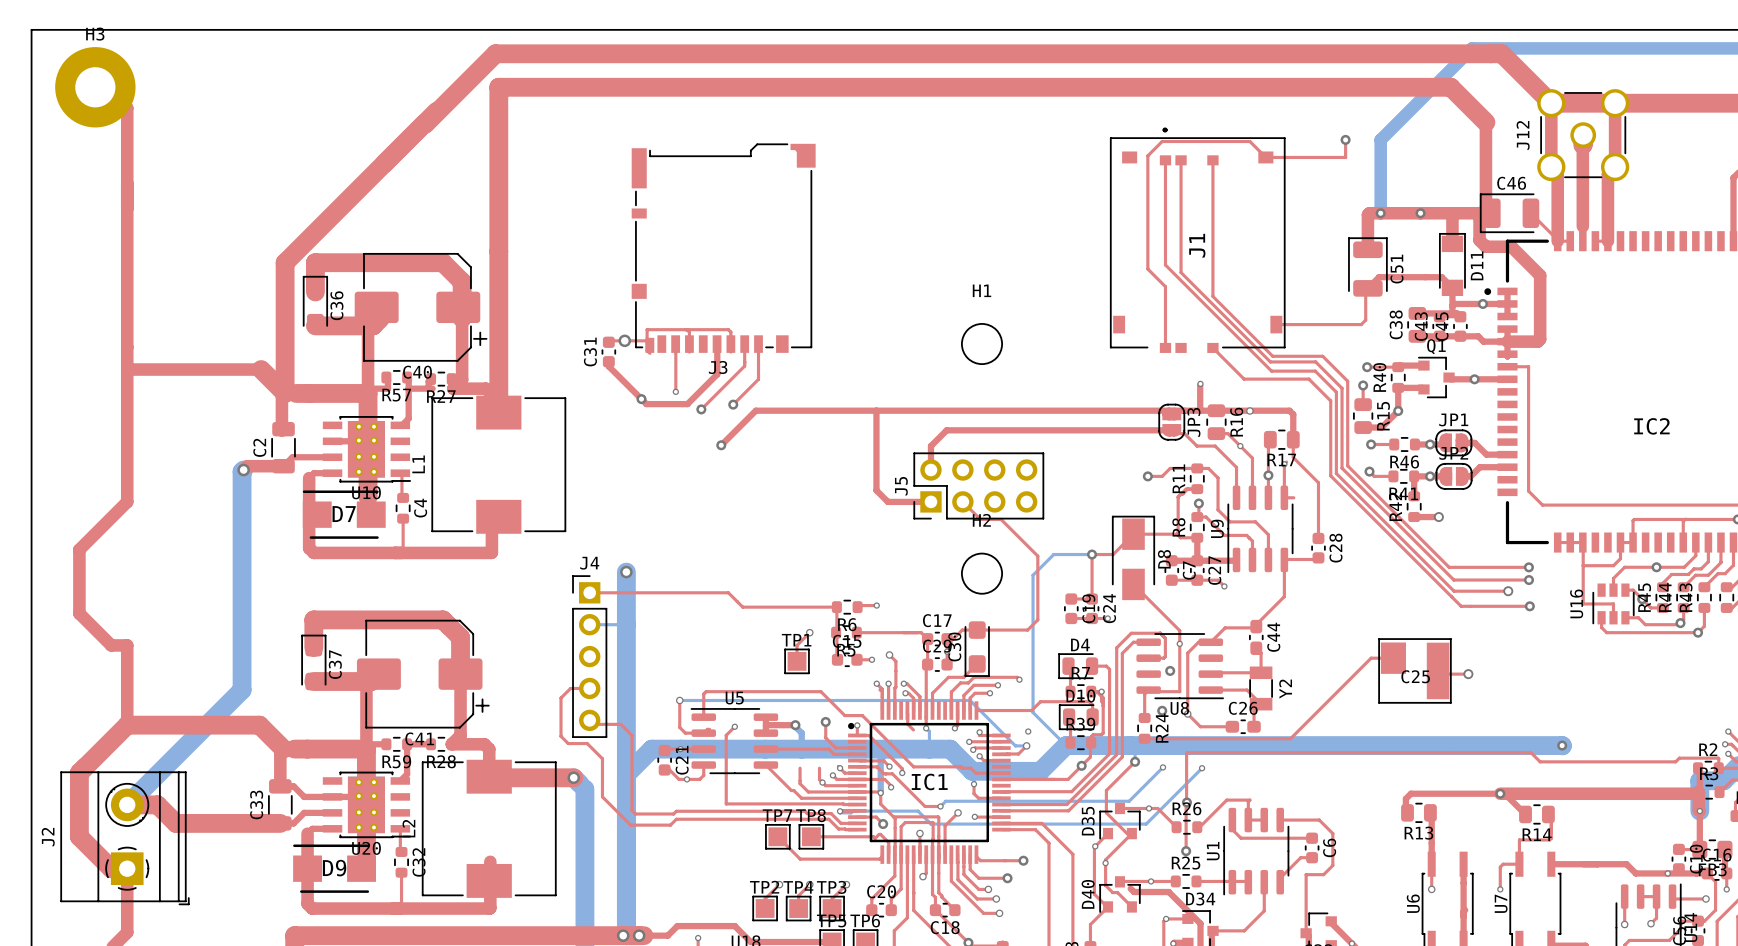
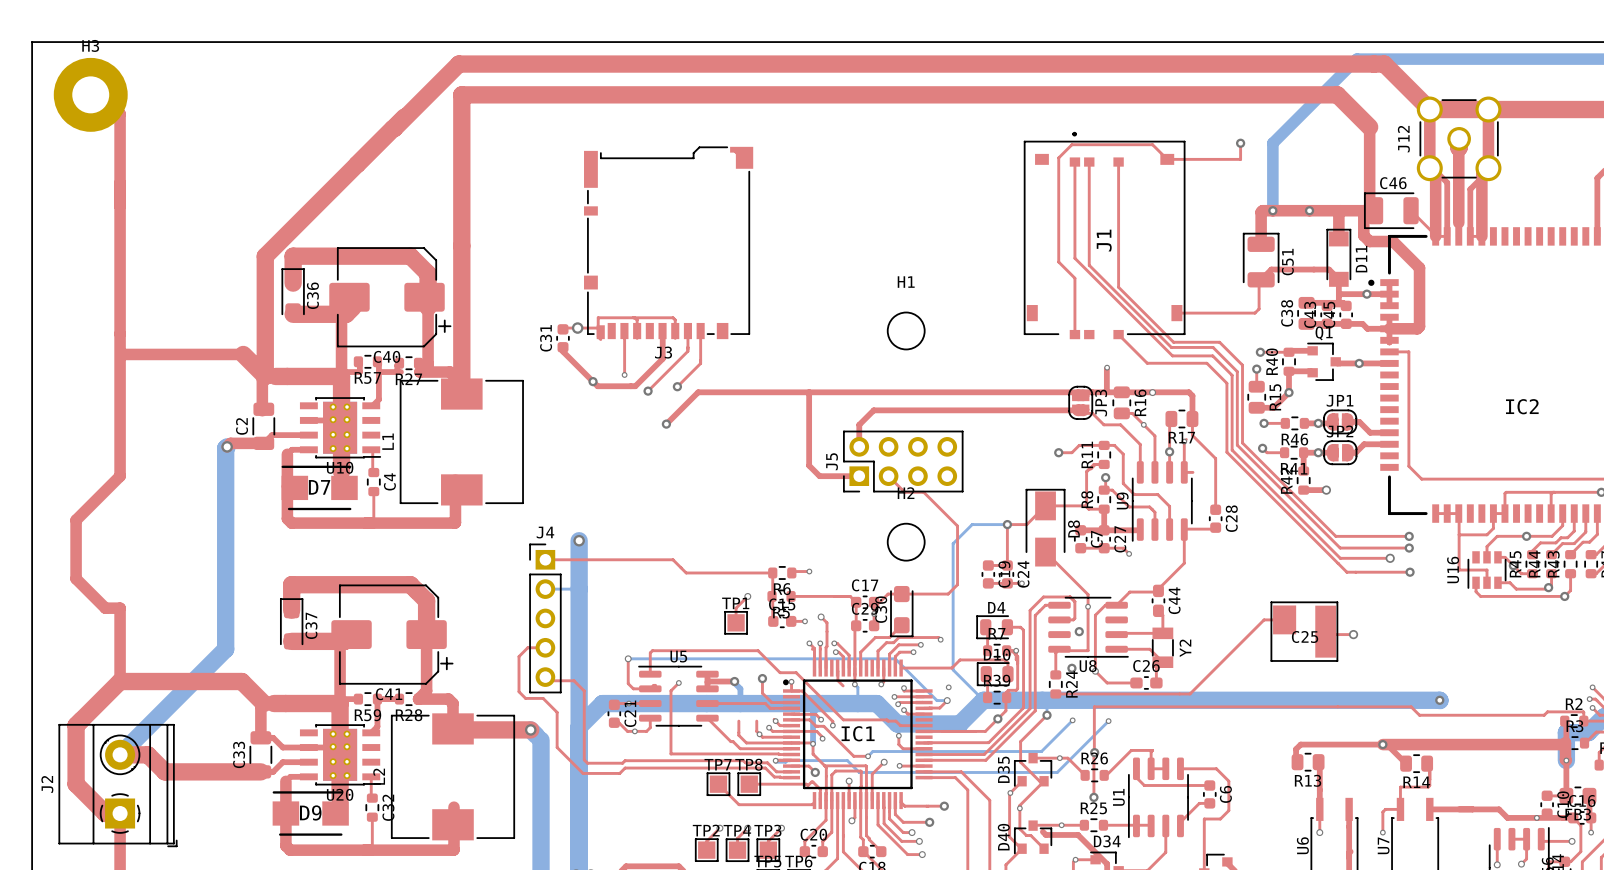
top track: none -> (1435, 171) (1447, 182) (1447, 236)
top track: none -> (1481, 177) (1470, 189) (1470, 236)

